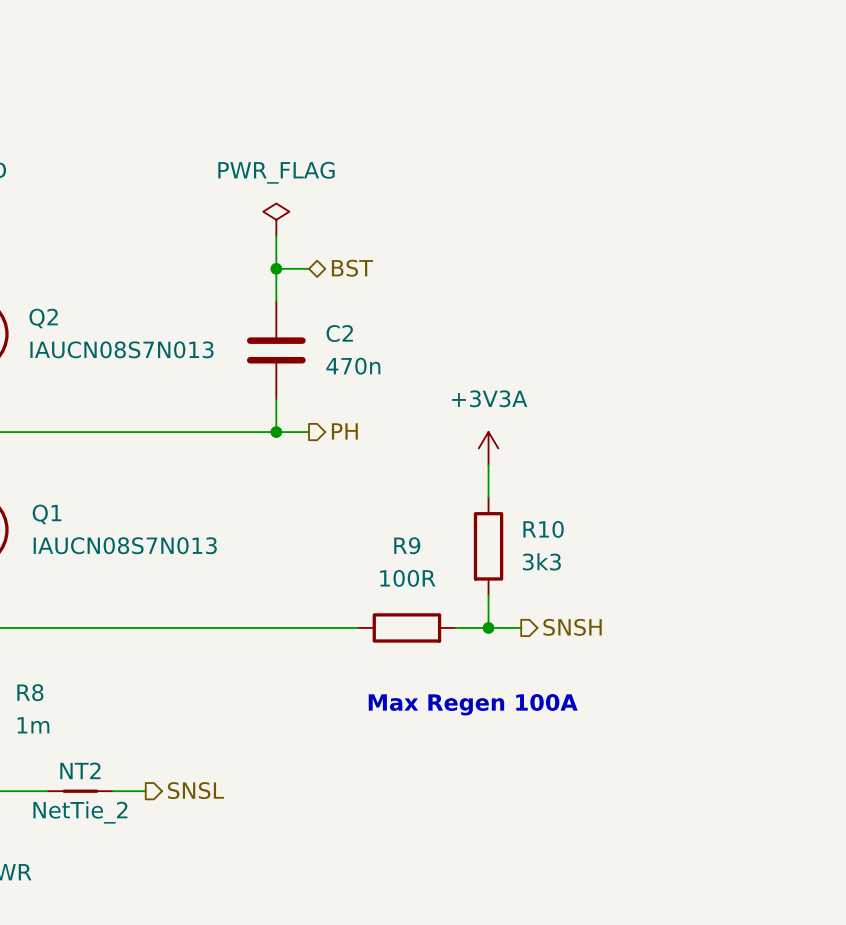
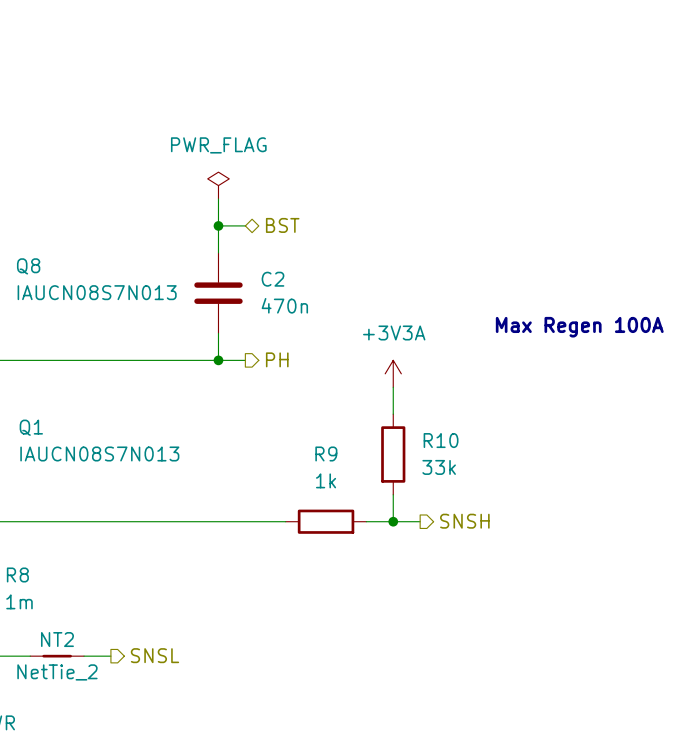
Q2 name: Q2 (43, 318) -> Q8 (28, 266)
text: none -> Max Regen 100A (579, 327)
R10 value: 3k3 (541, 561) -> 33k (439, 467)
R9 value: 100R (407, 578) -> 1k (326, 480)
text: Max Regen 100A (473, 704) -> none

